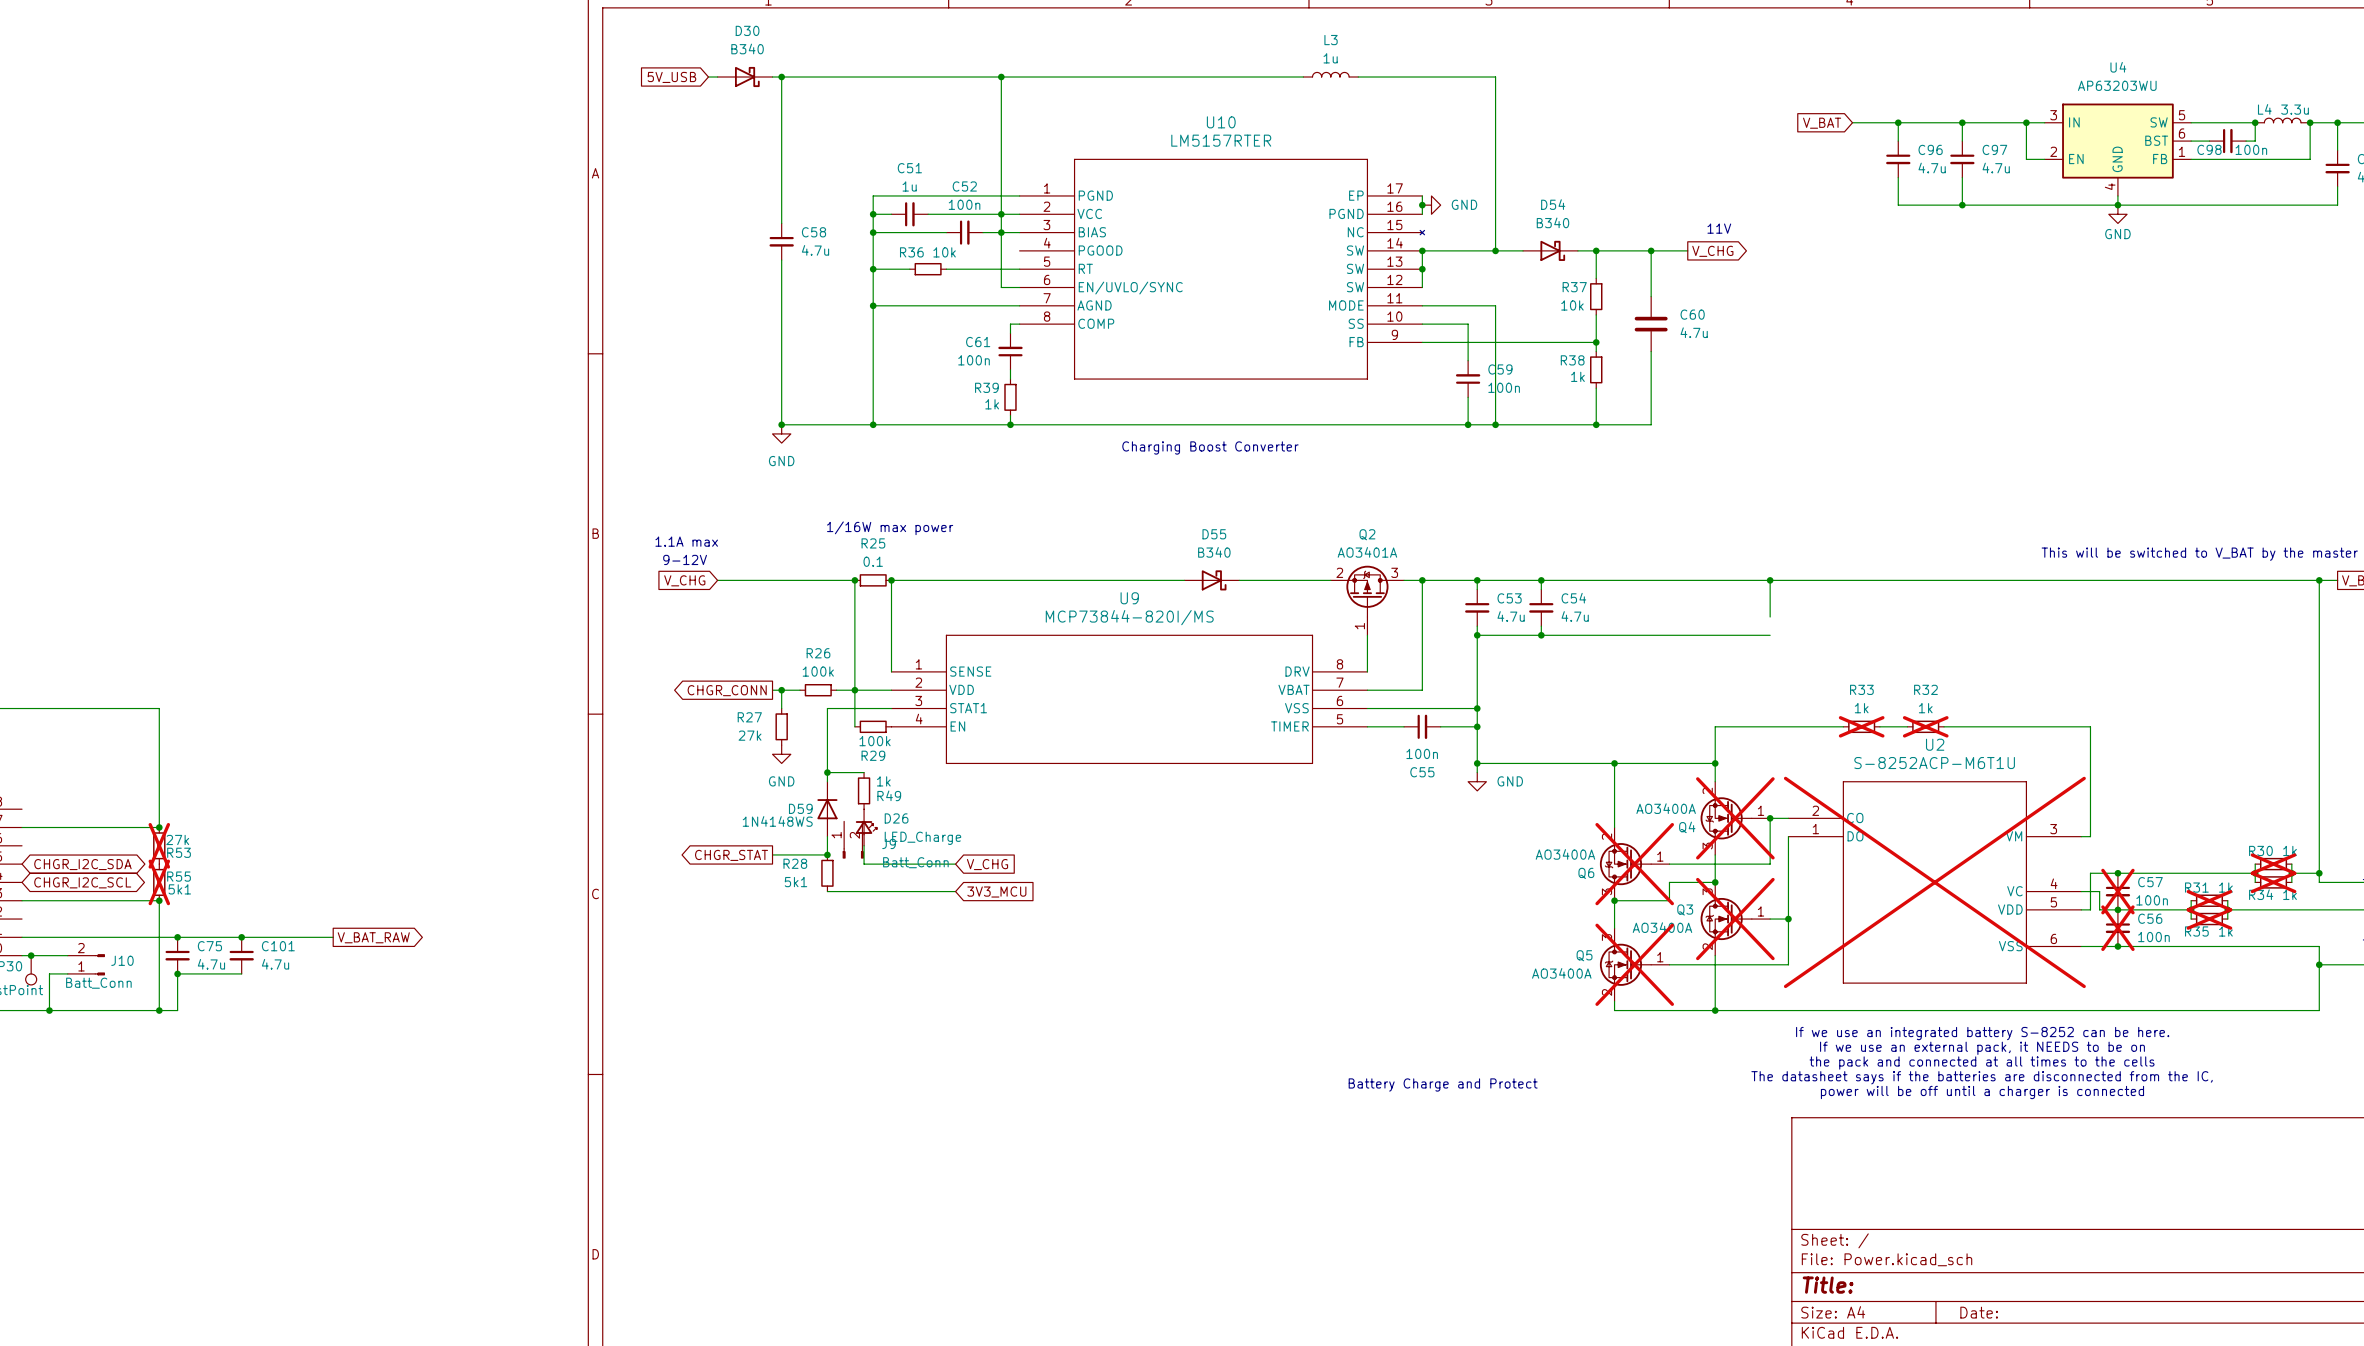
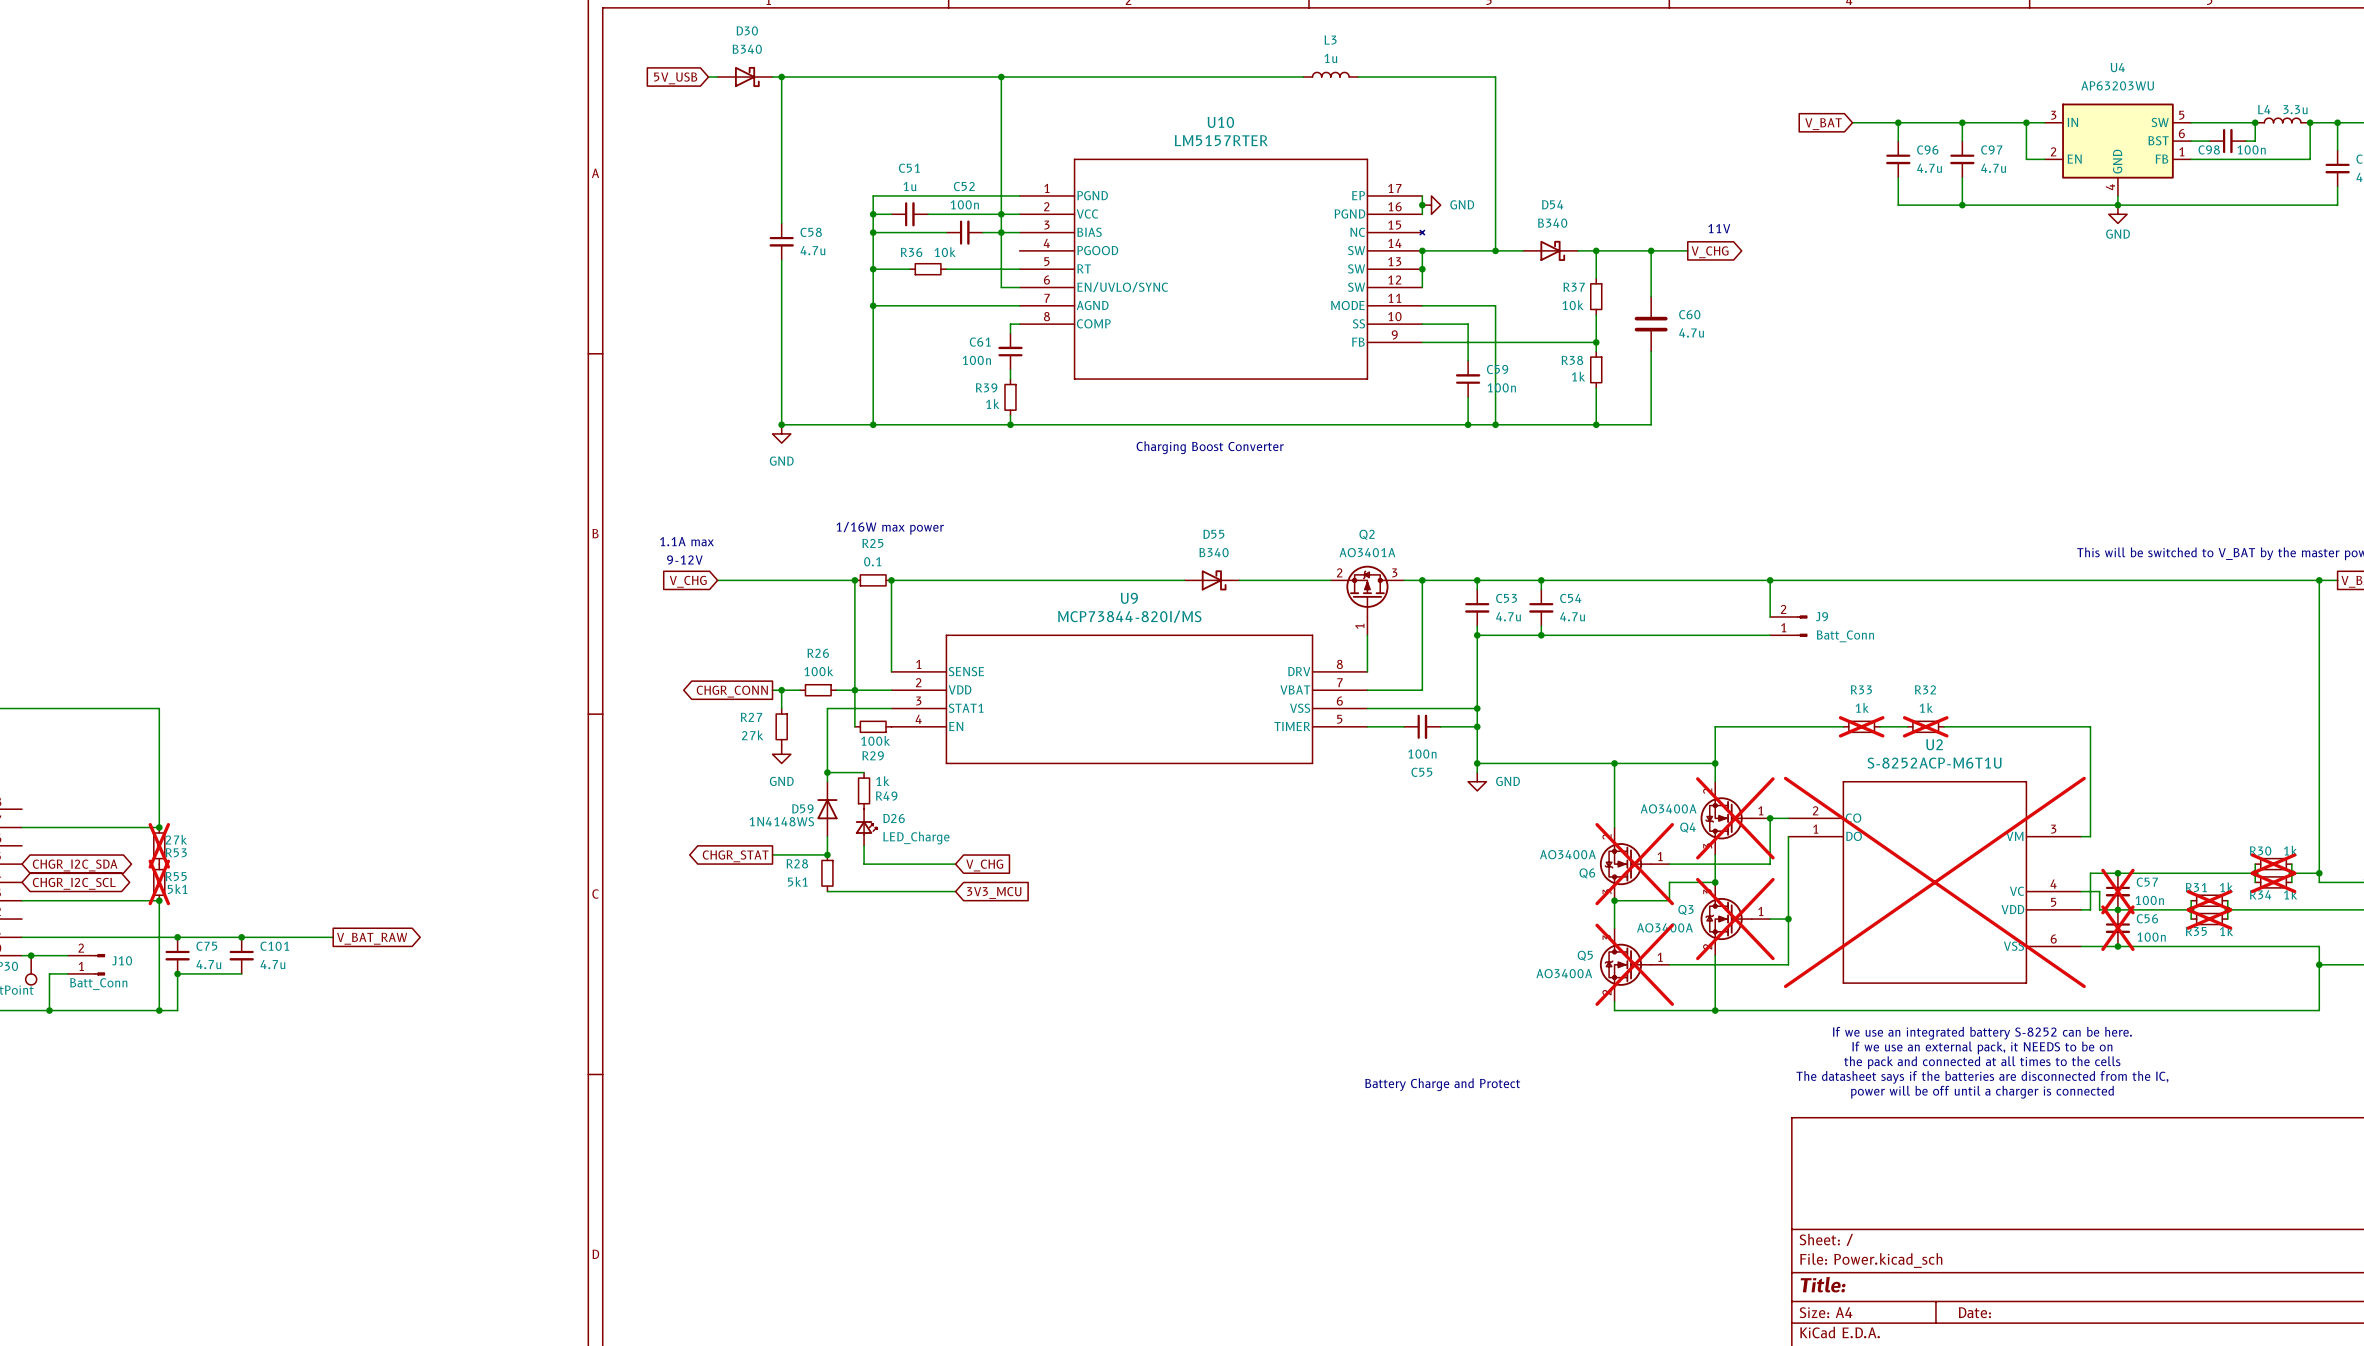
J9 position: (853, 839) -> (1788, 626)
J9 rotation: 0° (853, 853) -> 90° counterclockwise (1802, 626)

